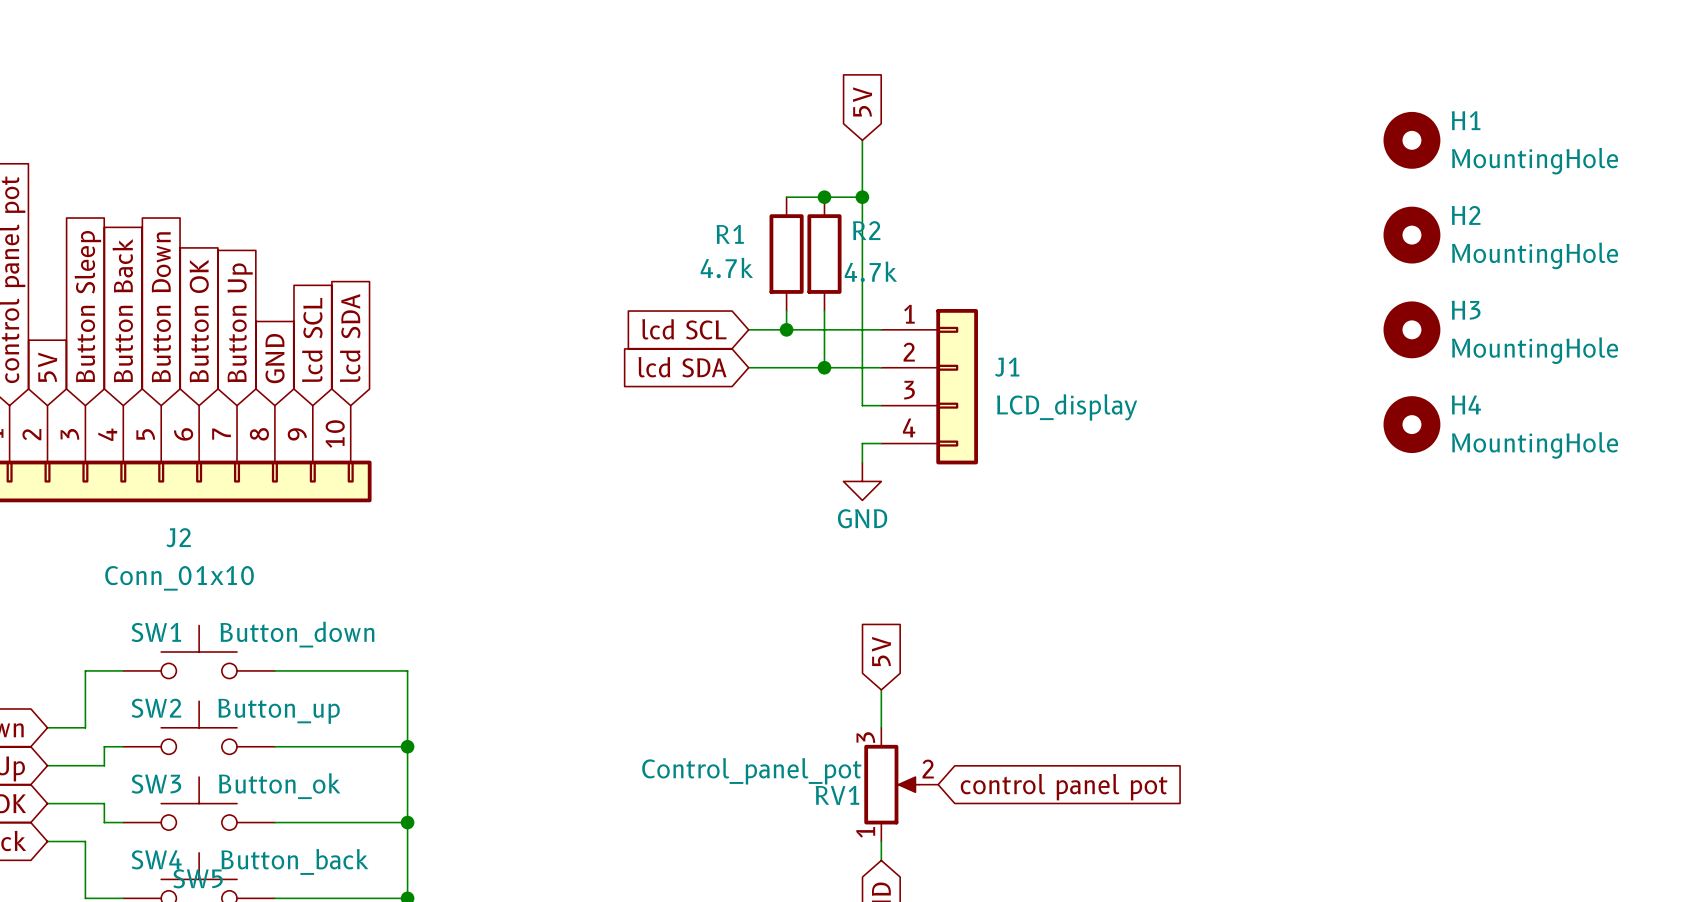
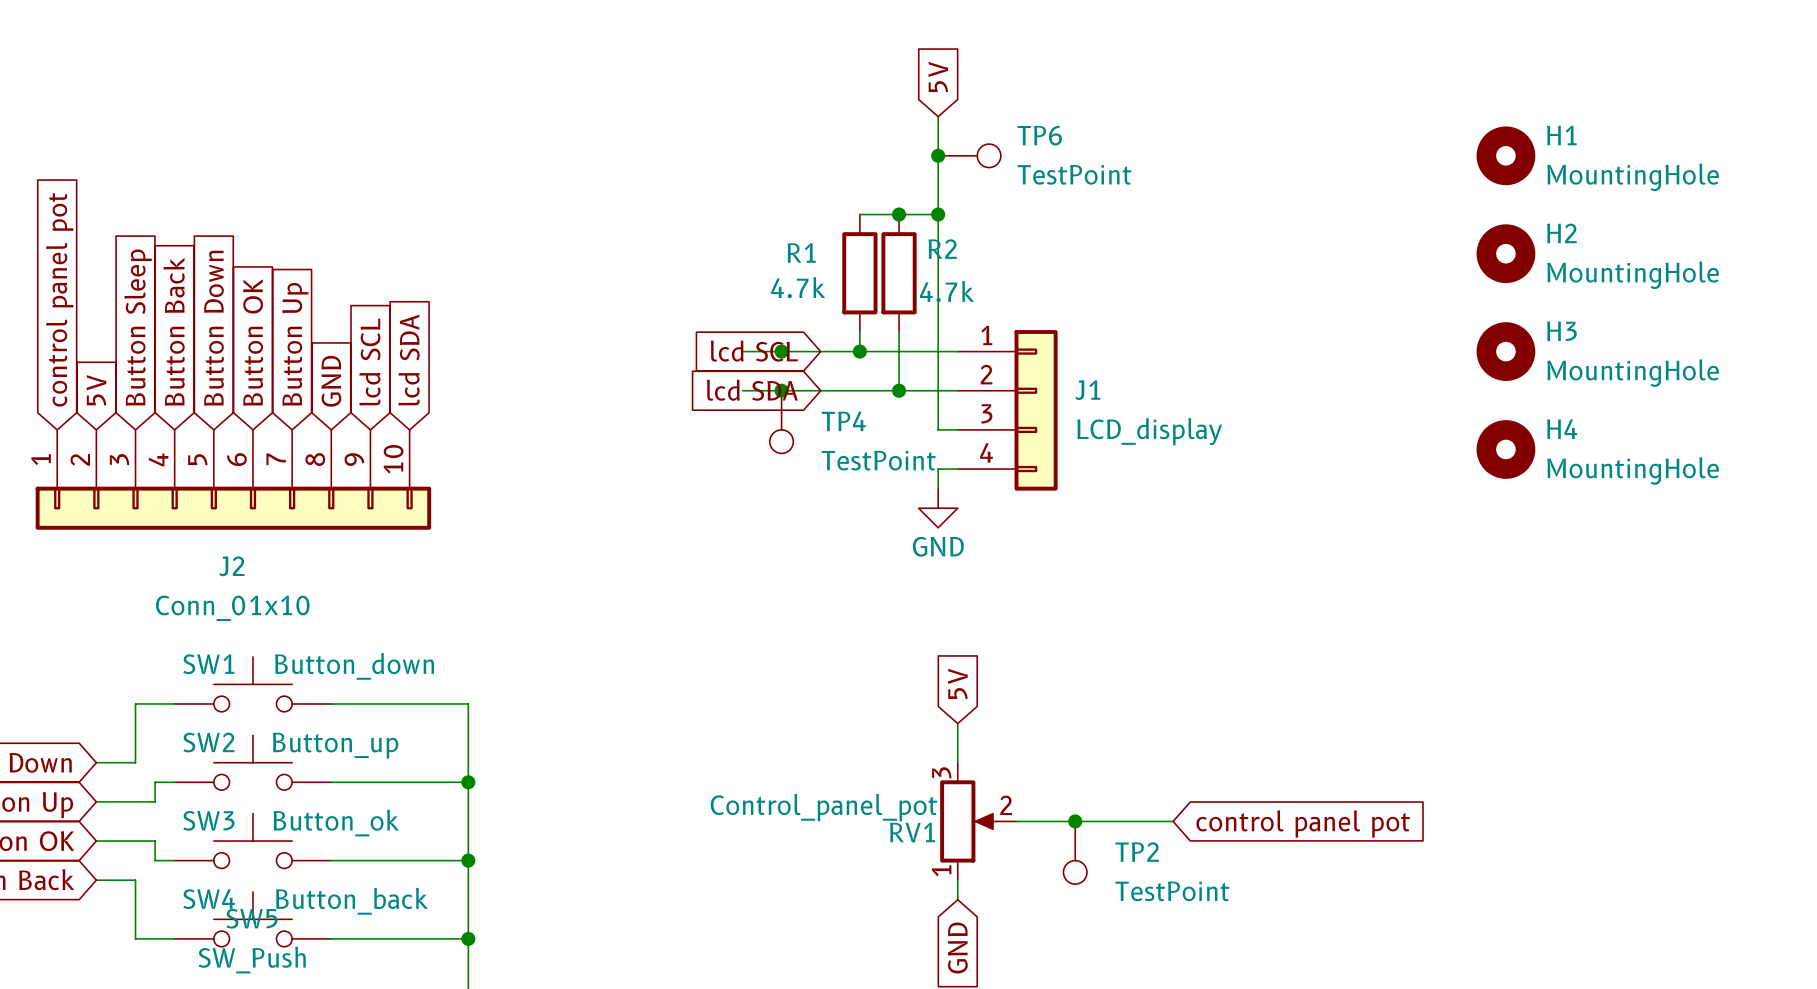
global label position: 5V (862, 101) -> 5V (938, 76)
wire: none -> (938, 116) (938, 155)
junction: none -> (938, 155)
TP6: none -> TestPoint (969, 155)
wire: none -> (742, 351) (820, 351)
junction: none -> (781, 351)
wire: none -> (742, 390) (820, 390)
junction: none -> (781, 390)
TP4: none -> TestPoint (781, 422)
wire: none -> (1016, 821) (1173, 821)
junction: none -> (1075, 821)
global label position: control panel pot (1064, 787) -> control panel pot (1303, 824)
TP2: none -> TestPoint (1075, 852)

